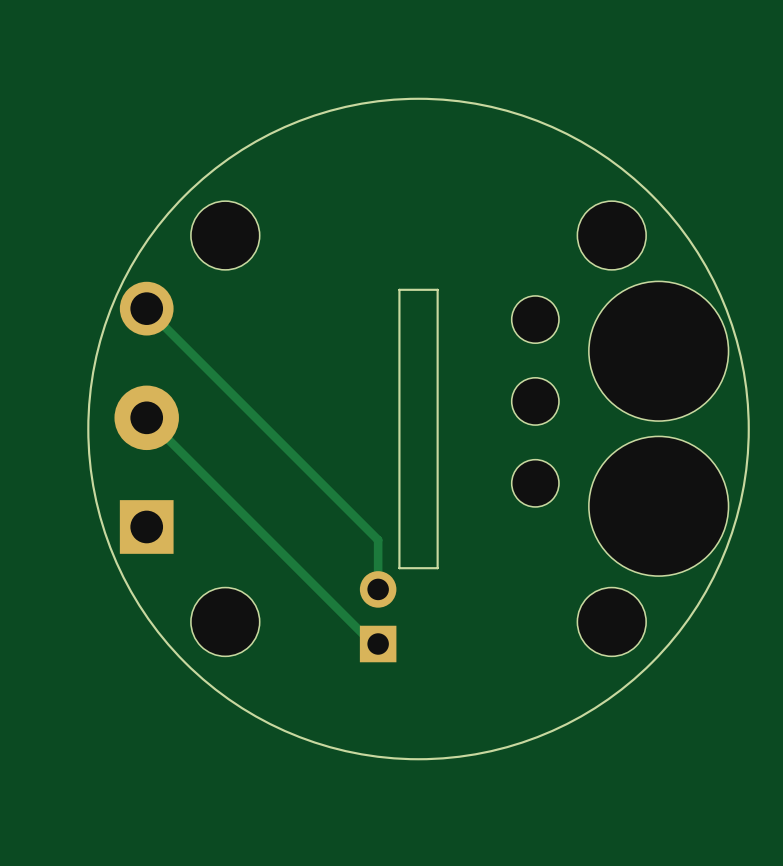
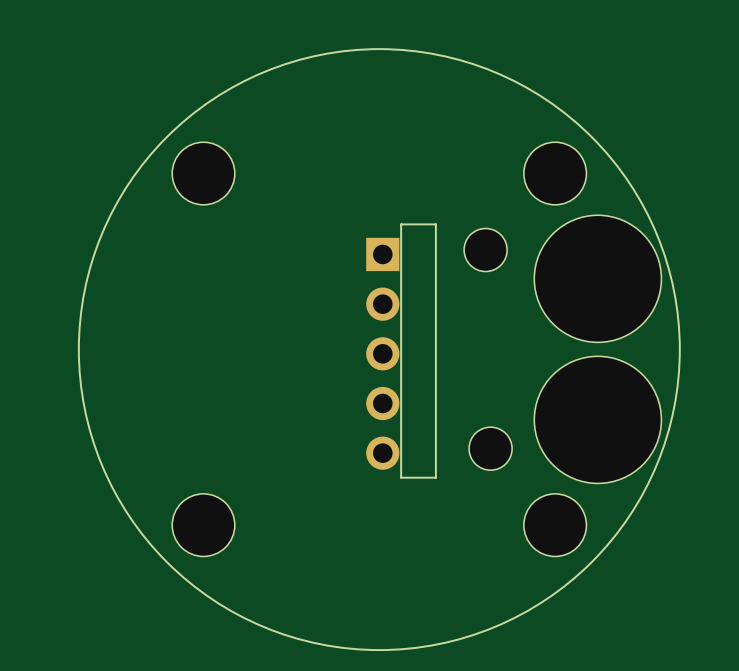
board edge: (437, 289) (437, 568) (399, 568) (399, 289) (437, 289) -> (435, 224) (435, 477) (401, 477) (401, 224) (435, 224)
track: (146, 308) (378, 540) (378, 589) -> none
part: (535, 401) -> none
track: (146, 417) (372, 644) (378, 644) -> none
part: (146, 417) -> none
part: none -> (382, 353)
part position: (535, 483) -> (490, 448)
part: (378, 616) -> none

